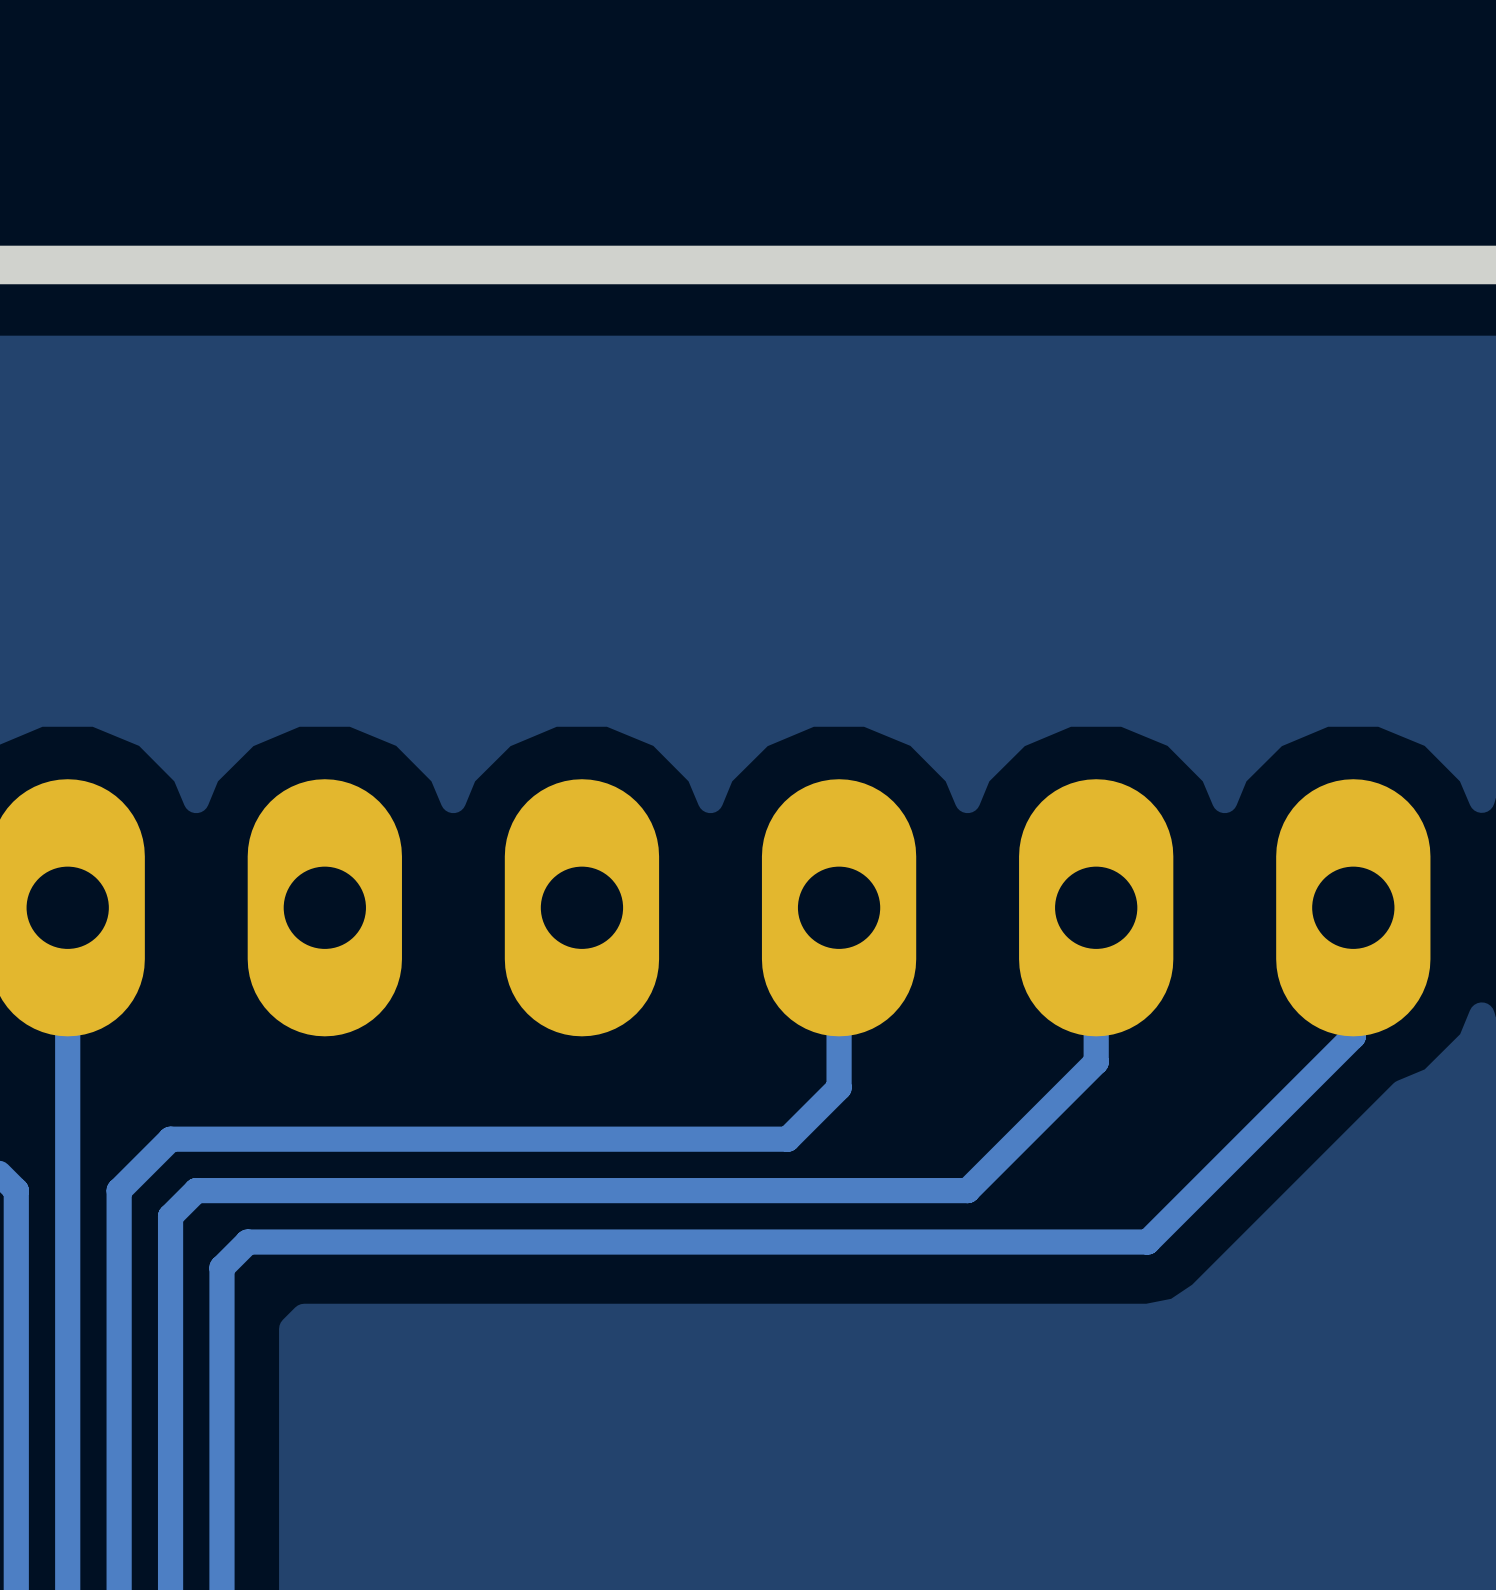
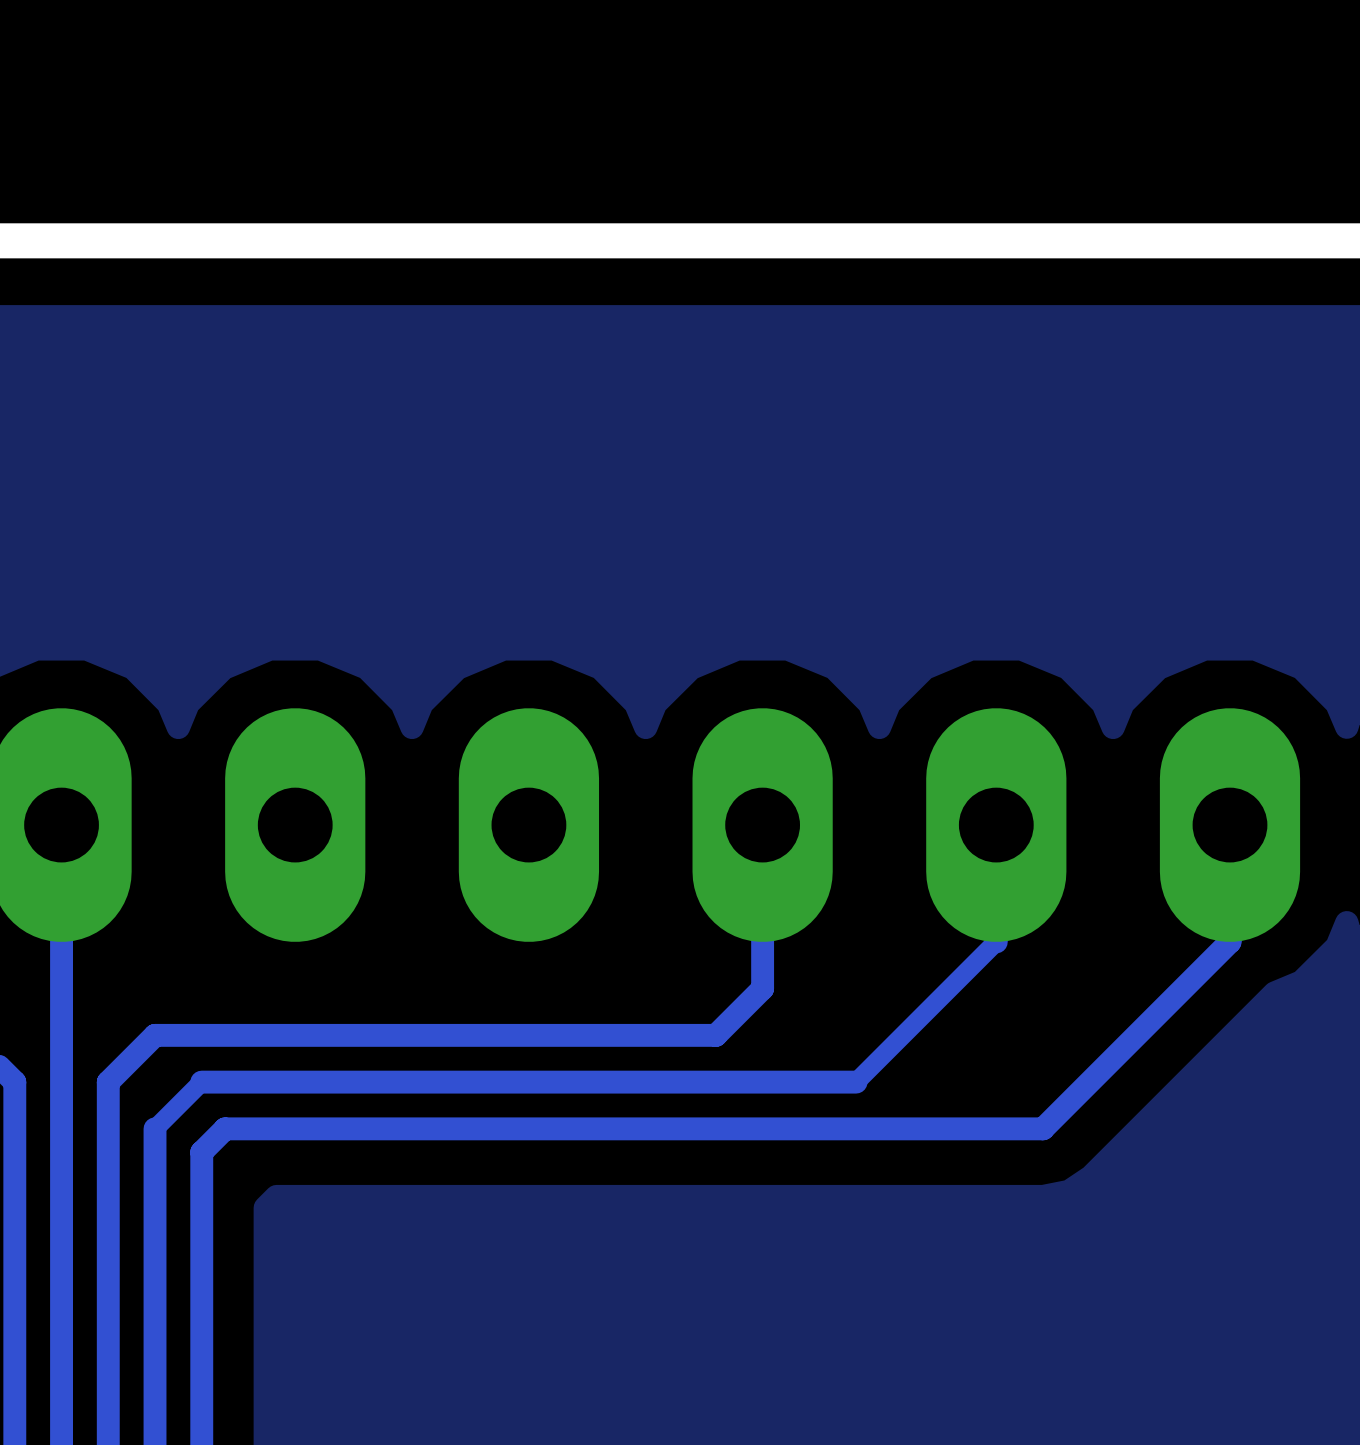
track: (1096, 1036) (1096, 1062) (967, 1190) (941, 1190) -> (996, 941) (856, 1082)
track: (221, 1190) (196, 1190) (170, 1216) (170, 1242) -> (201, 1082) (155, 1128)

